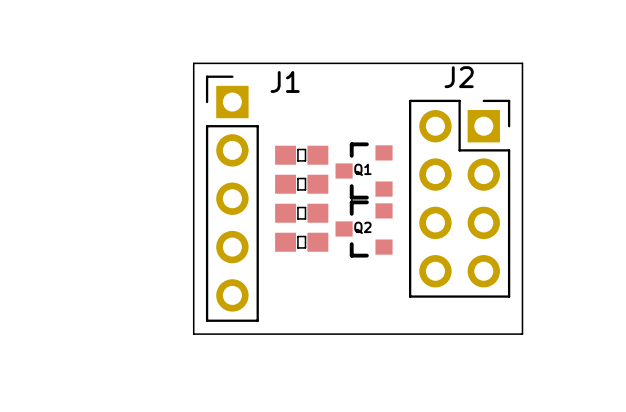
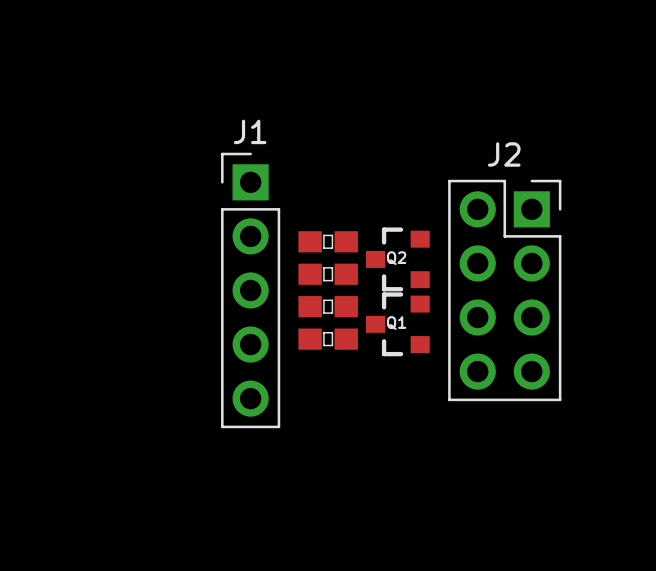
board edge: (193, 63) (193, 334) (522, 334) (522, 63) (193, 63) -> none
J1 name position: J1 (285, 81) -> J1 (250, 131)
Q1 name: Q1 (362, 169) -> Q2 (396, 258)
Q2 name: Q2 (362, 227) -> Q1 (396, 323)

